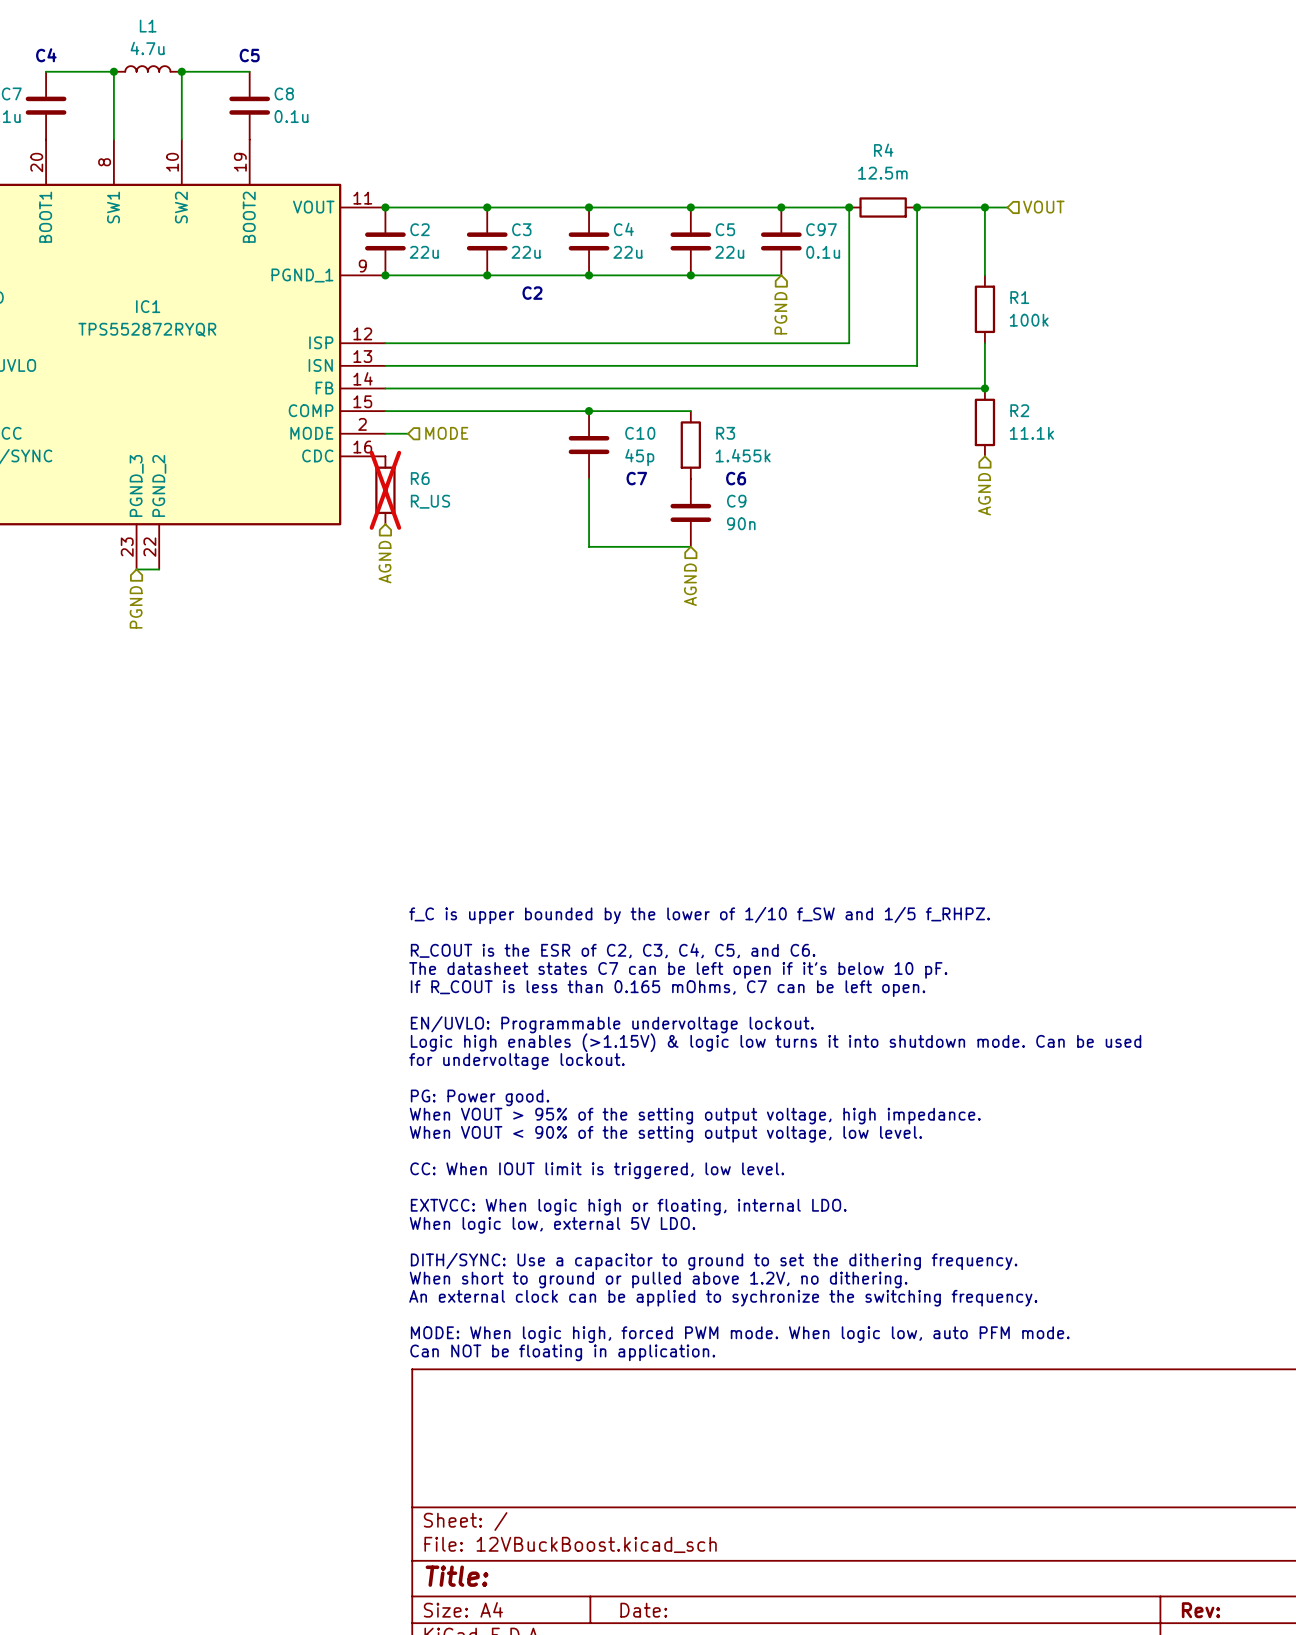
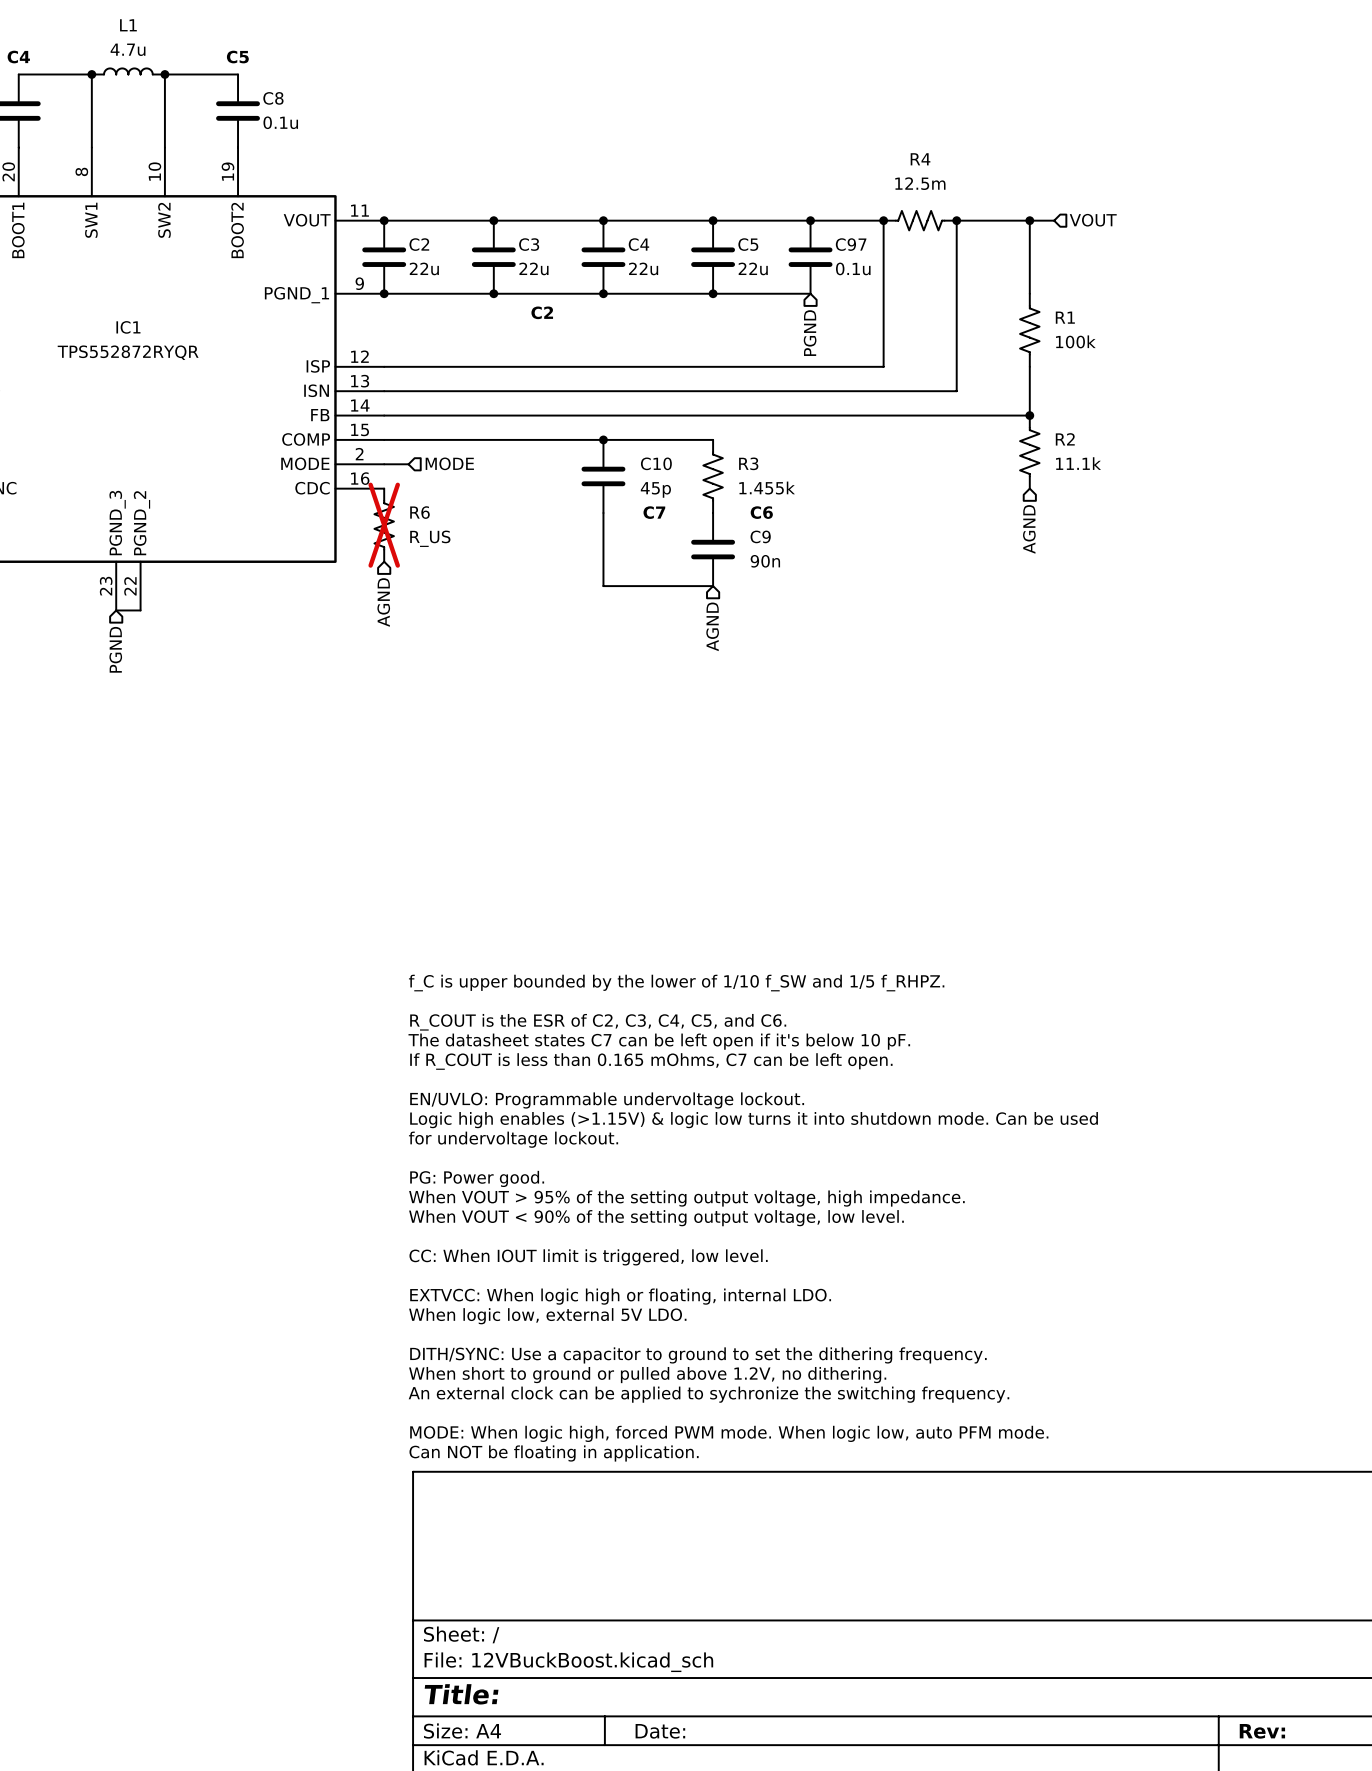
R4 symbol: [849, 197, 918, 218] -> [883, 210, 957, 231]
R1 symbol: [974, 275, 996, 344] -> [1020, 293, 1040, 367]
R2 symbol: [974, 388, 996, 457] -> [1020, 415, 1040, 489]
R3 symbol: [680, 411, 702, 479] -> [703, 439, 723, 514]
R6 symbol: [375, 456, 396, 525] -> [374, 488, 394, 562]

